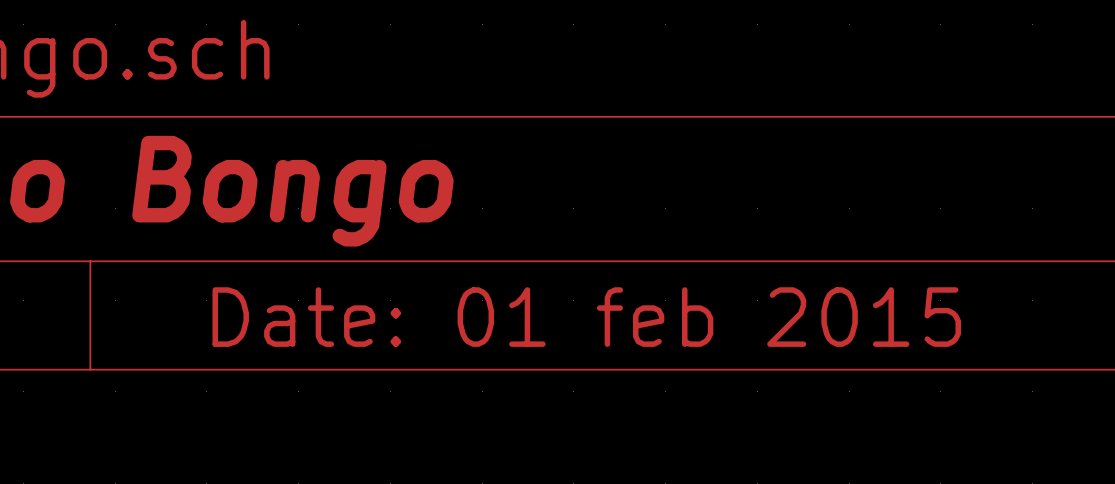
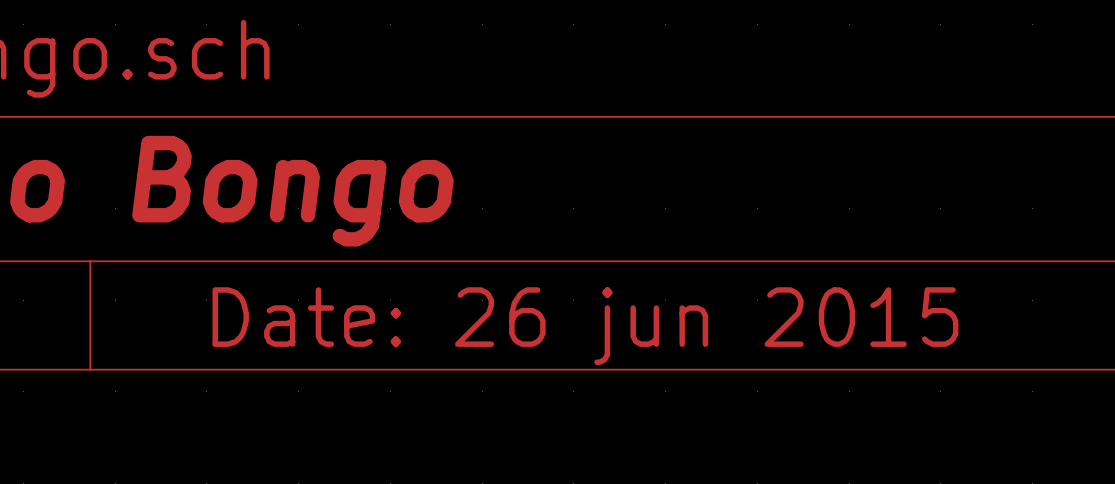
title block: Date: 01 feb 2015 (586, 317) -> Date: 26 jun 2015 (585, 326)

